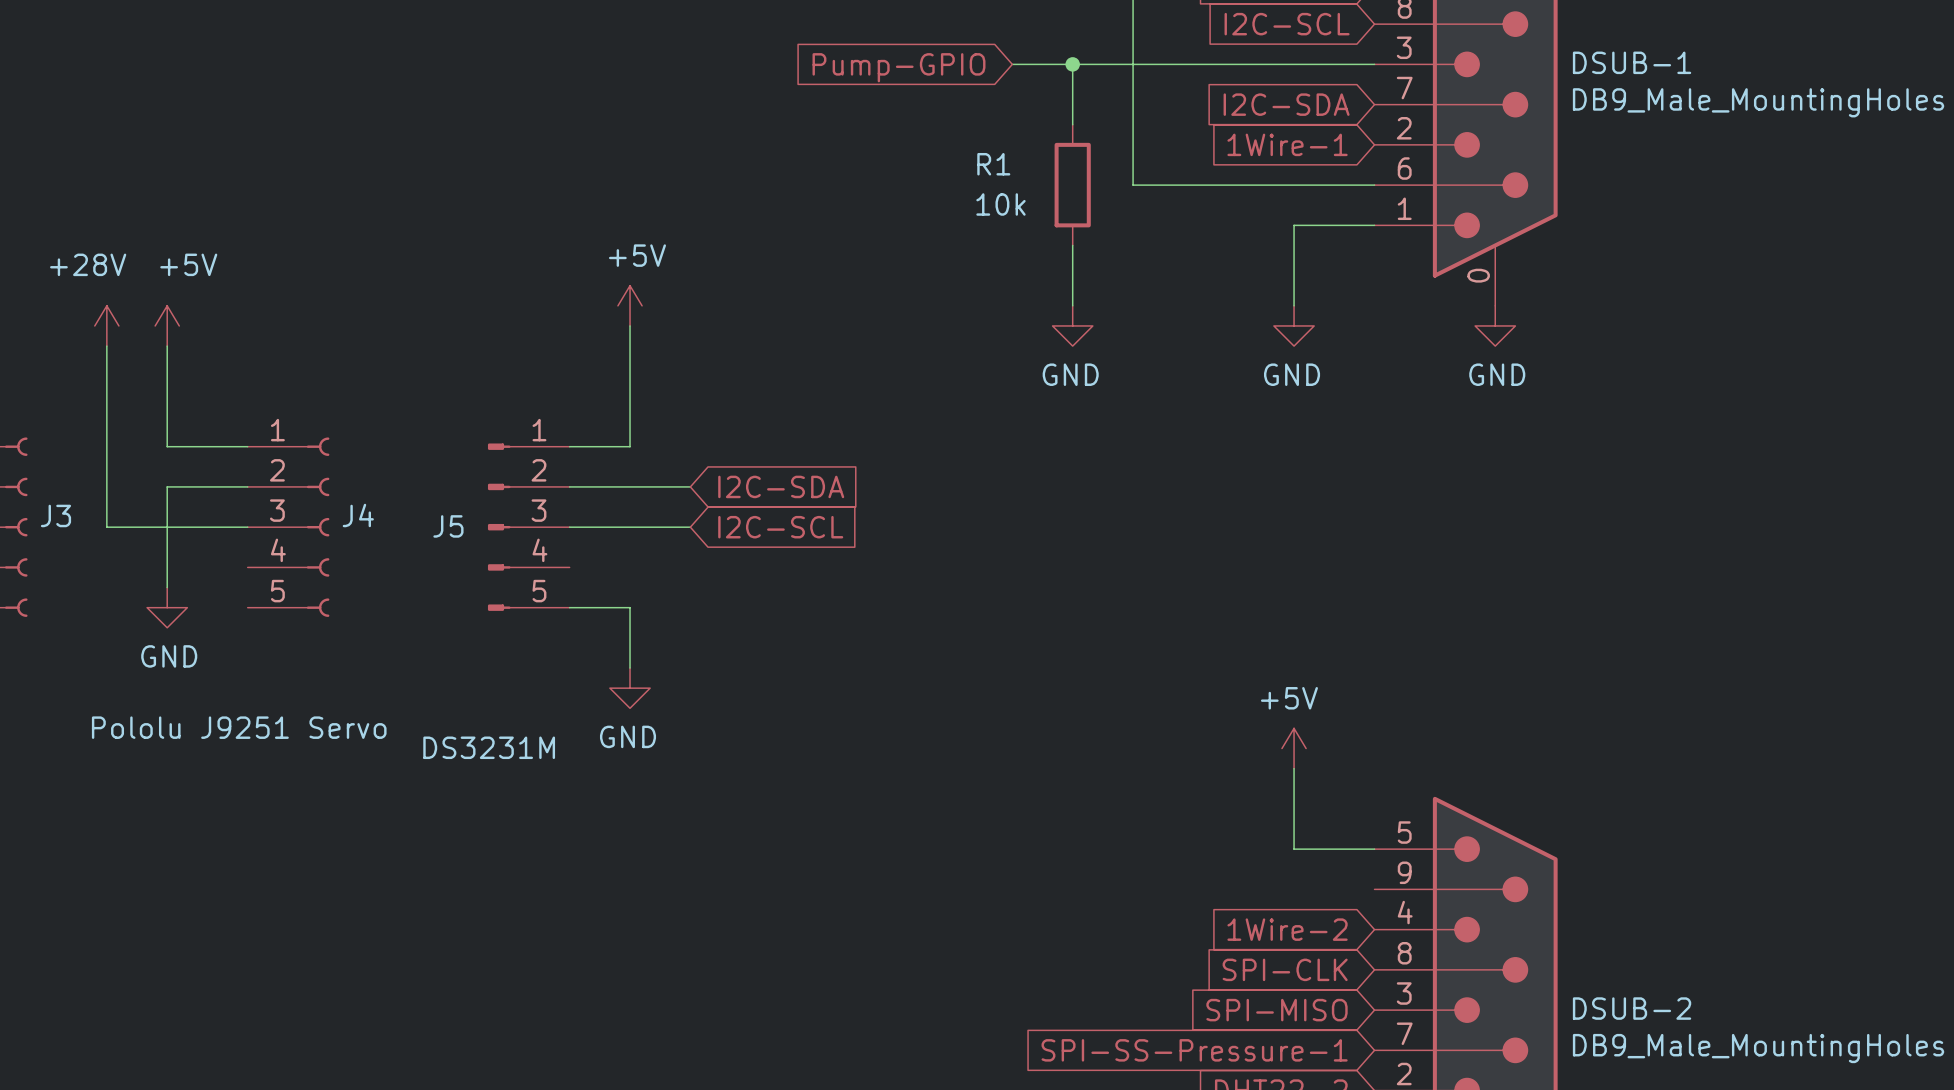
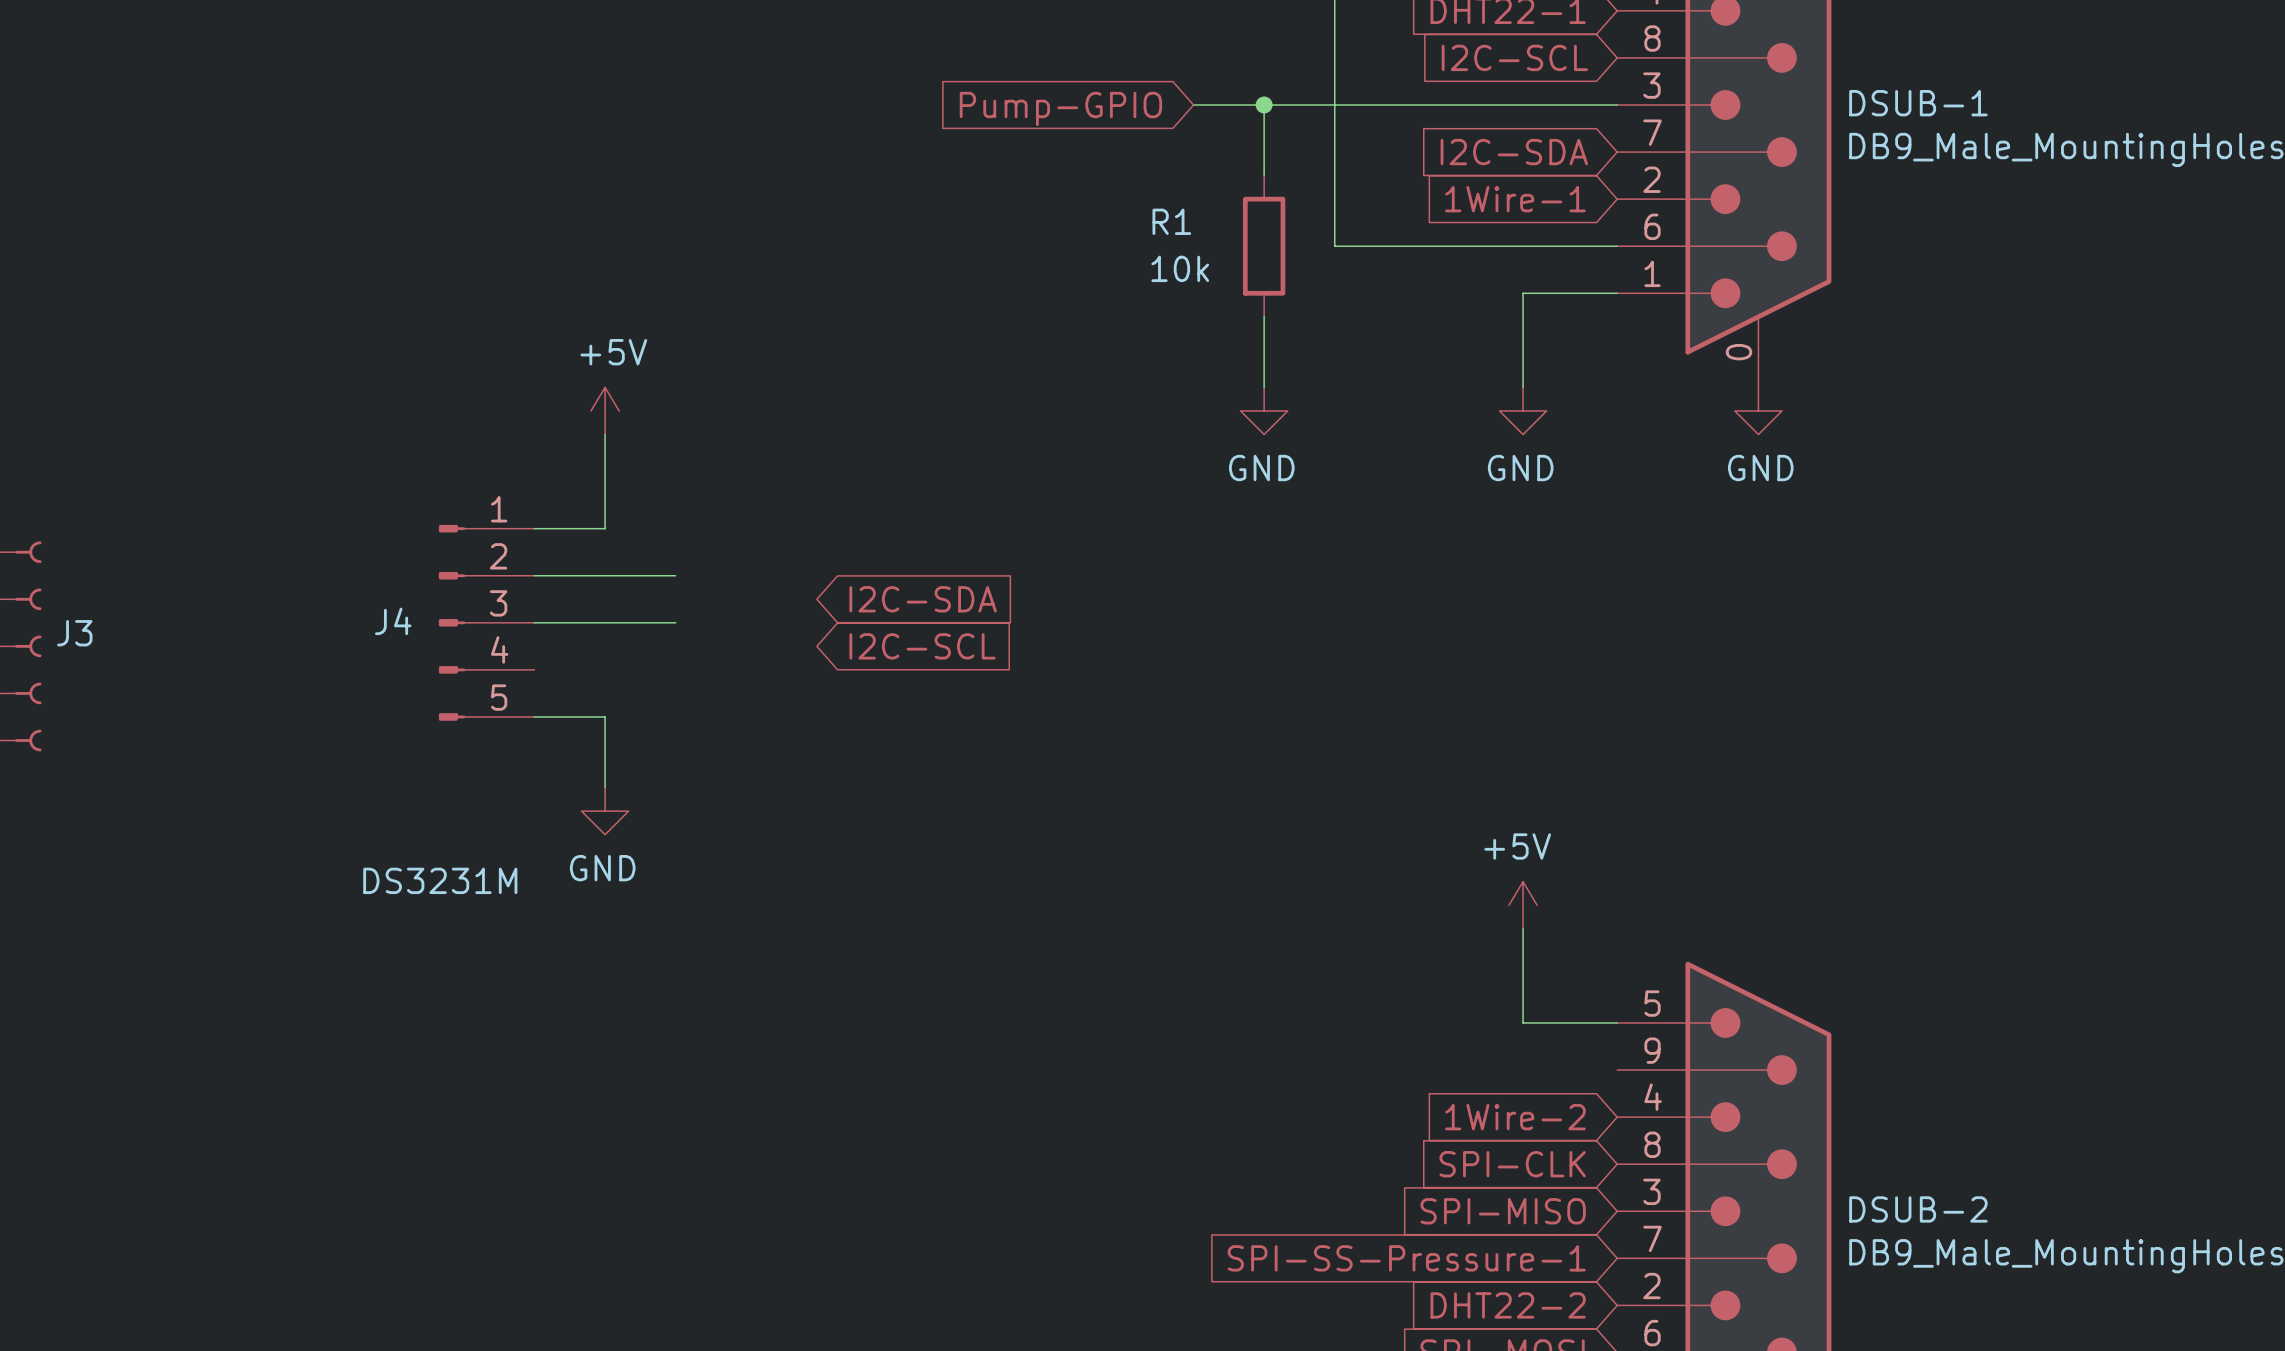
power symbol position: +5V (630, 305) -> +5V (605, 410)
power symbol: +28V (106, 325) -> none
power symbol: +5V (167, 325) -> none
wire: (630, 325) (630, 446) (569, 446) -> none
wire: (106, 346) (106, 527) (247, 527) -> none
wire: (167, 346) (167, 446) (247, 446) -> none
wire: none -> (605, 434) (605, 528) (534, 528)
J4 symbol: [247, 437, 330, 617] -> [438, 524, 535, 721]
wire: (247, 486) (167, 486) (167, 587) -> none
wire: (569, 486) (690, 486) -> (534, 575) (675, 575)
J4 name position: J4 (358, 515) -> J4 (393, 621)
J5: DS3231M (528, 527) -> none
wire: (569, 527) (690, 527) -> (534, 622) (675, 622)
power symbol: GND (167, 607) -> none
wire: (569, 607) (630, 607) (630, 668) -> (534, 716) (605, 716) (605, 787)
power symbol position: GND (630, 688) -> GND (605, 811)
J4 value: Pololu J9251 Servo (239, 727) -> DS3231M (440, 880)

